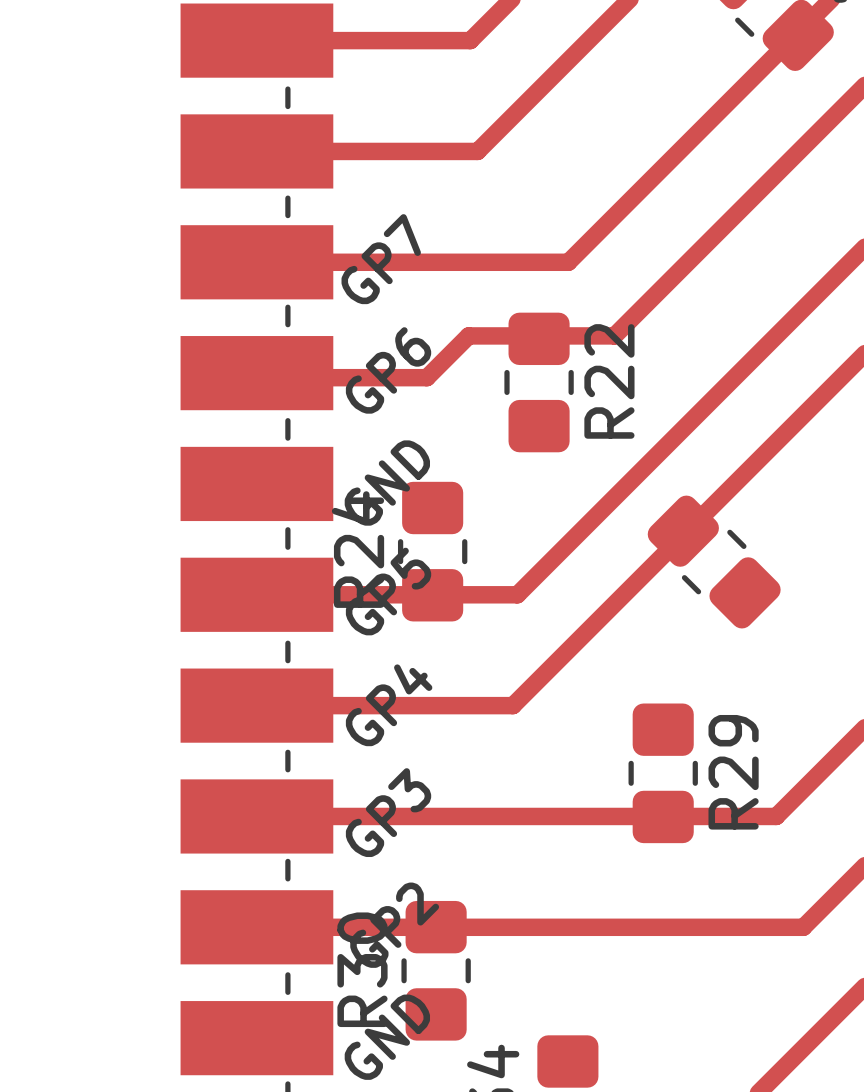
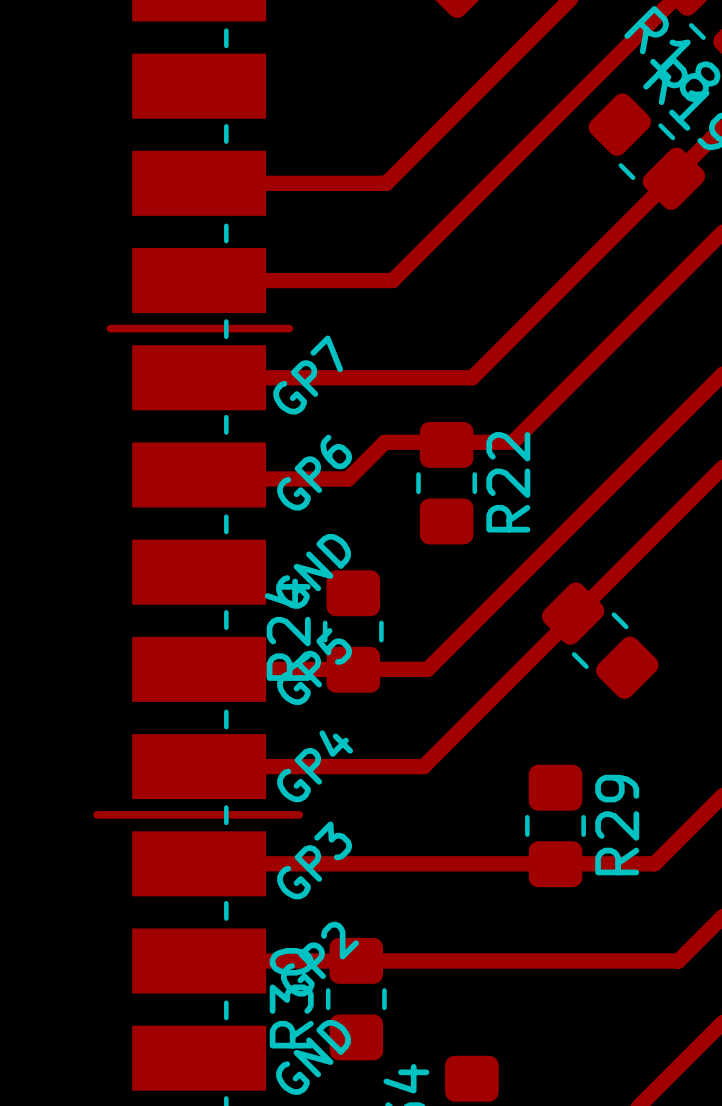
top track: none -> (110, 328) (289, 328)
top track: none -> (96, 814) (299, 814)

